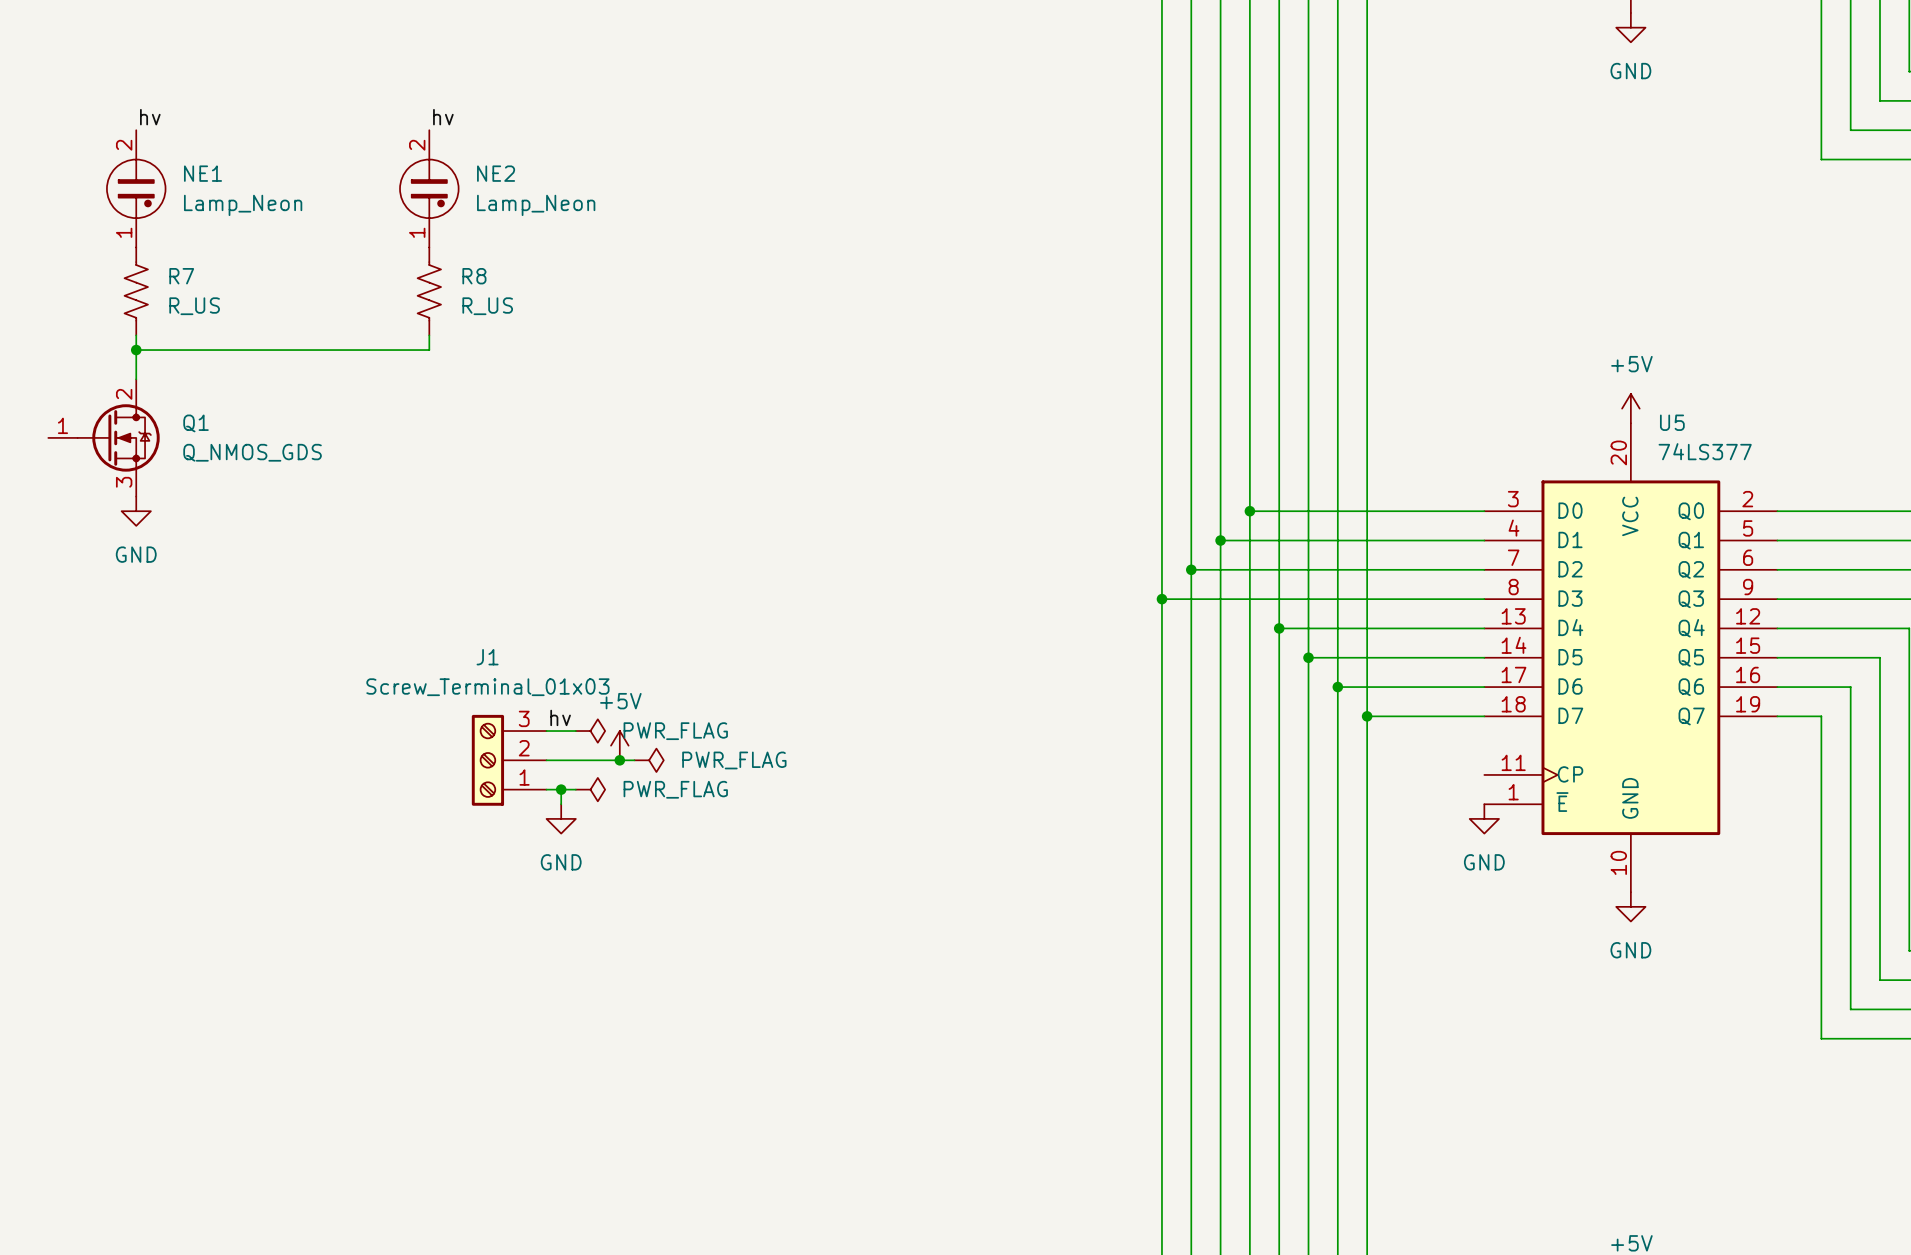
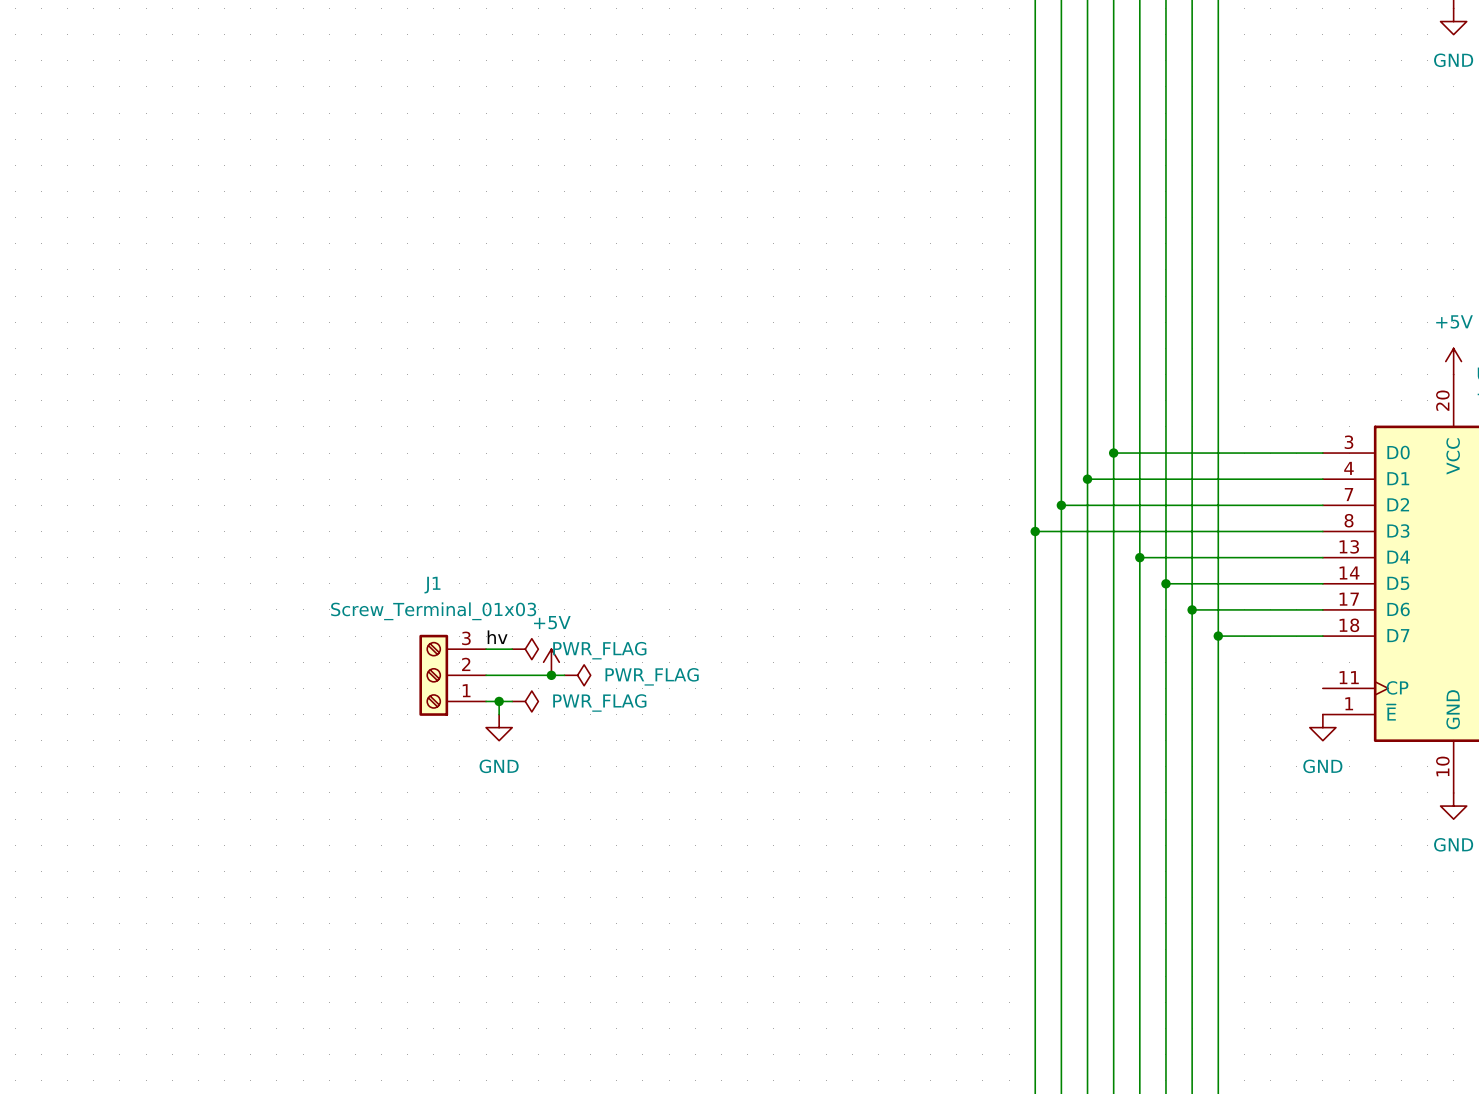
label: hv (150, 117) -> none
label: hv (443, 117) -> none
NE1: Lamp_Neon (136, 188) -> none
NE2: Lamp_Neon (429, 188) -> none
R7: R_US (136, 291) -> none
R8: R_US (429, 291) -> none
wire: (136, 335) (136, 379) -> none
wire: (429, 335) (429, 350) (136, 350) -> none
junction: (136, 350) -> none
Q1: Q_NMOS_GDS (104, 437) -> none
power symbol: GND (136, 511) -> none

